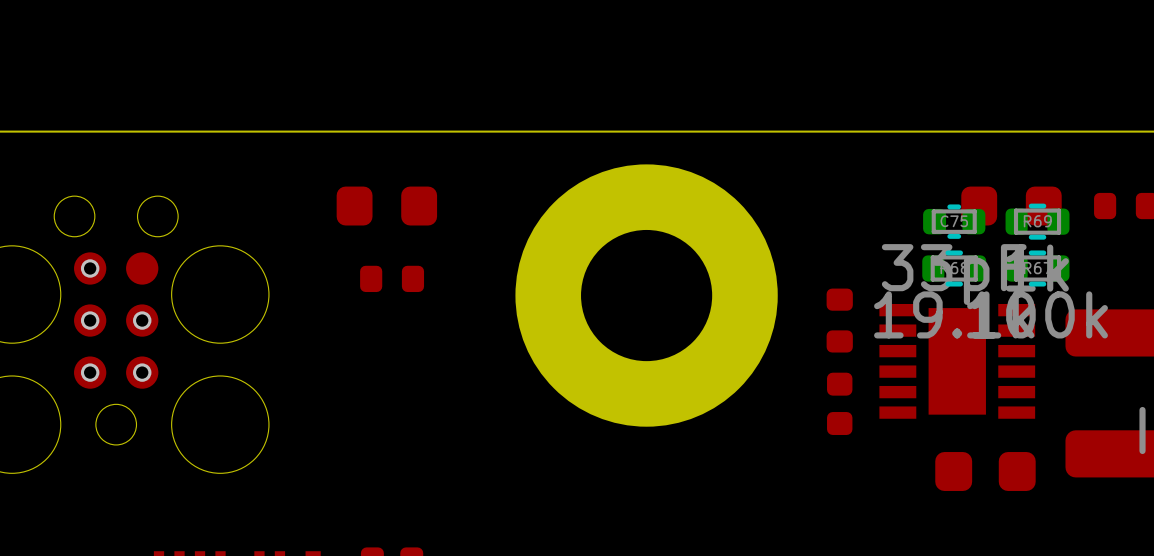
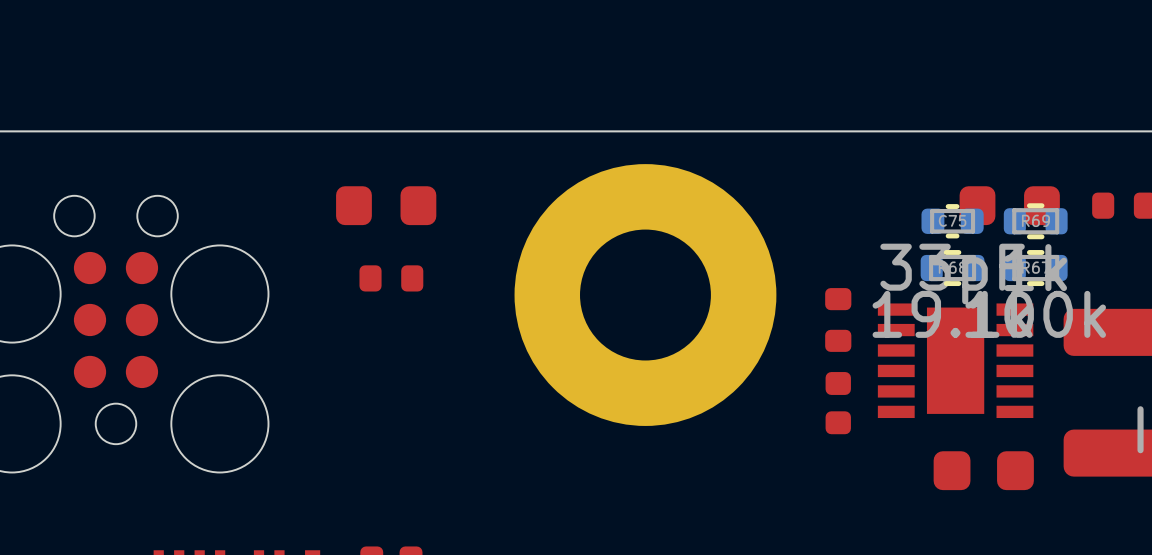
via: (90, 268) -> none
via: (90, 320) -> none
via: (142, 320) -> none
via: (90, 372) -> none
via: (142, 372) -> none

